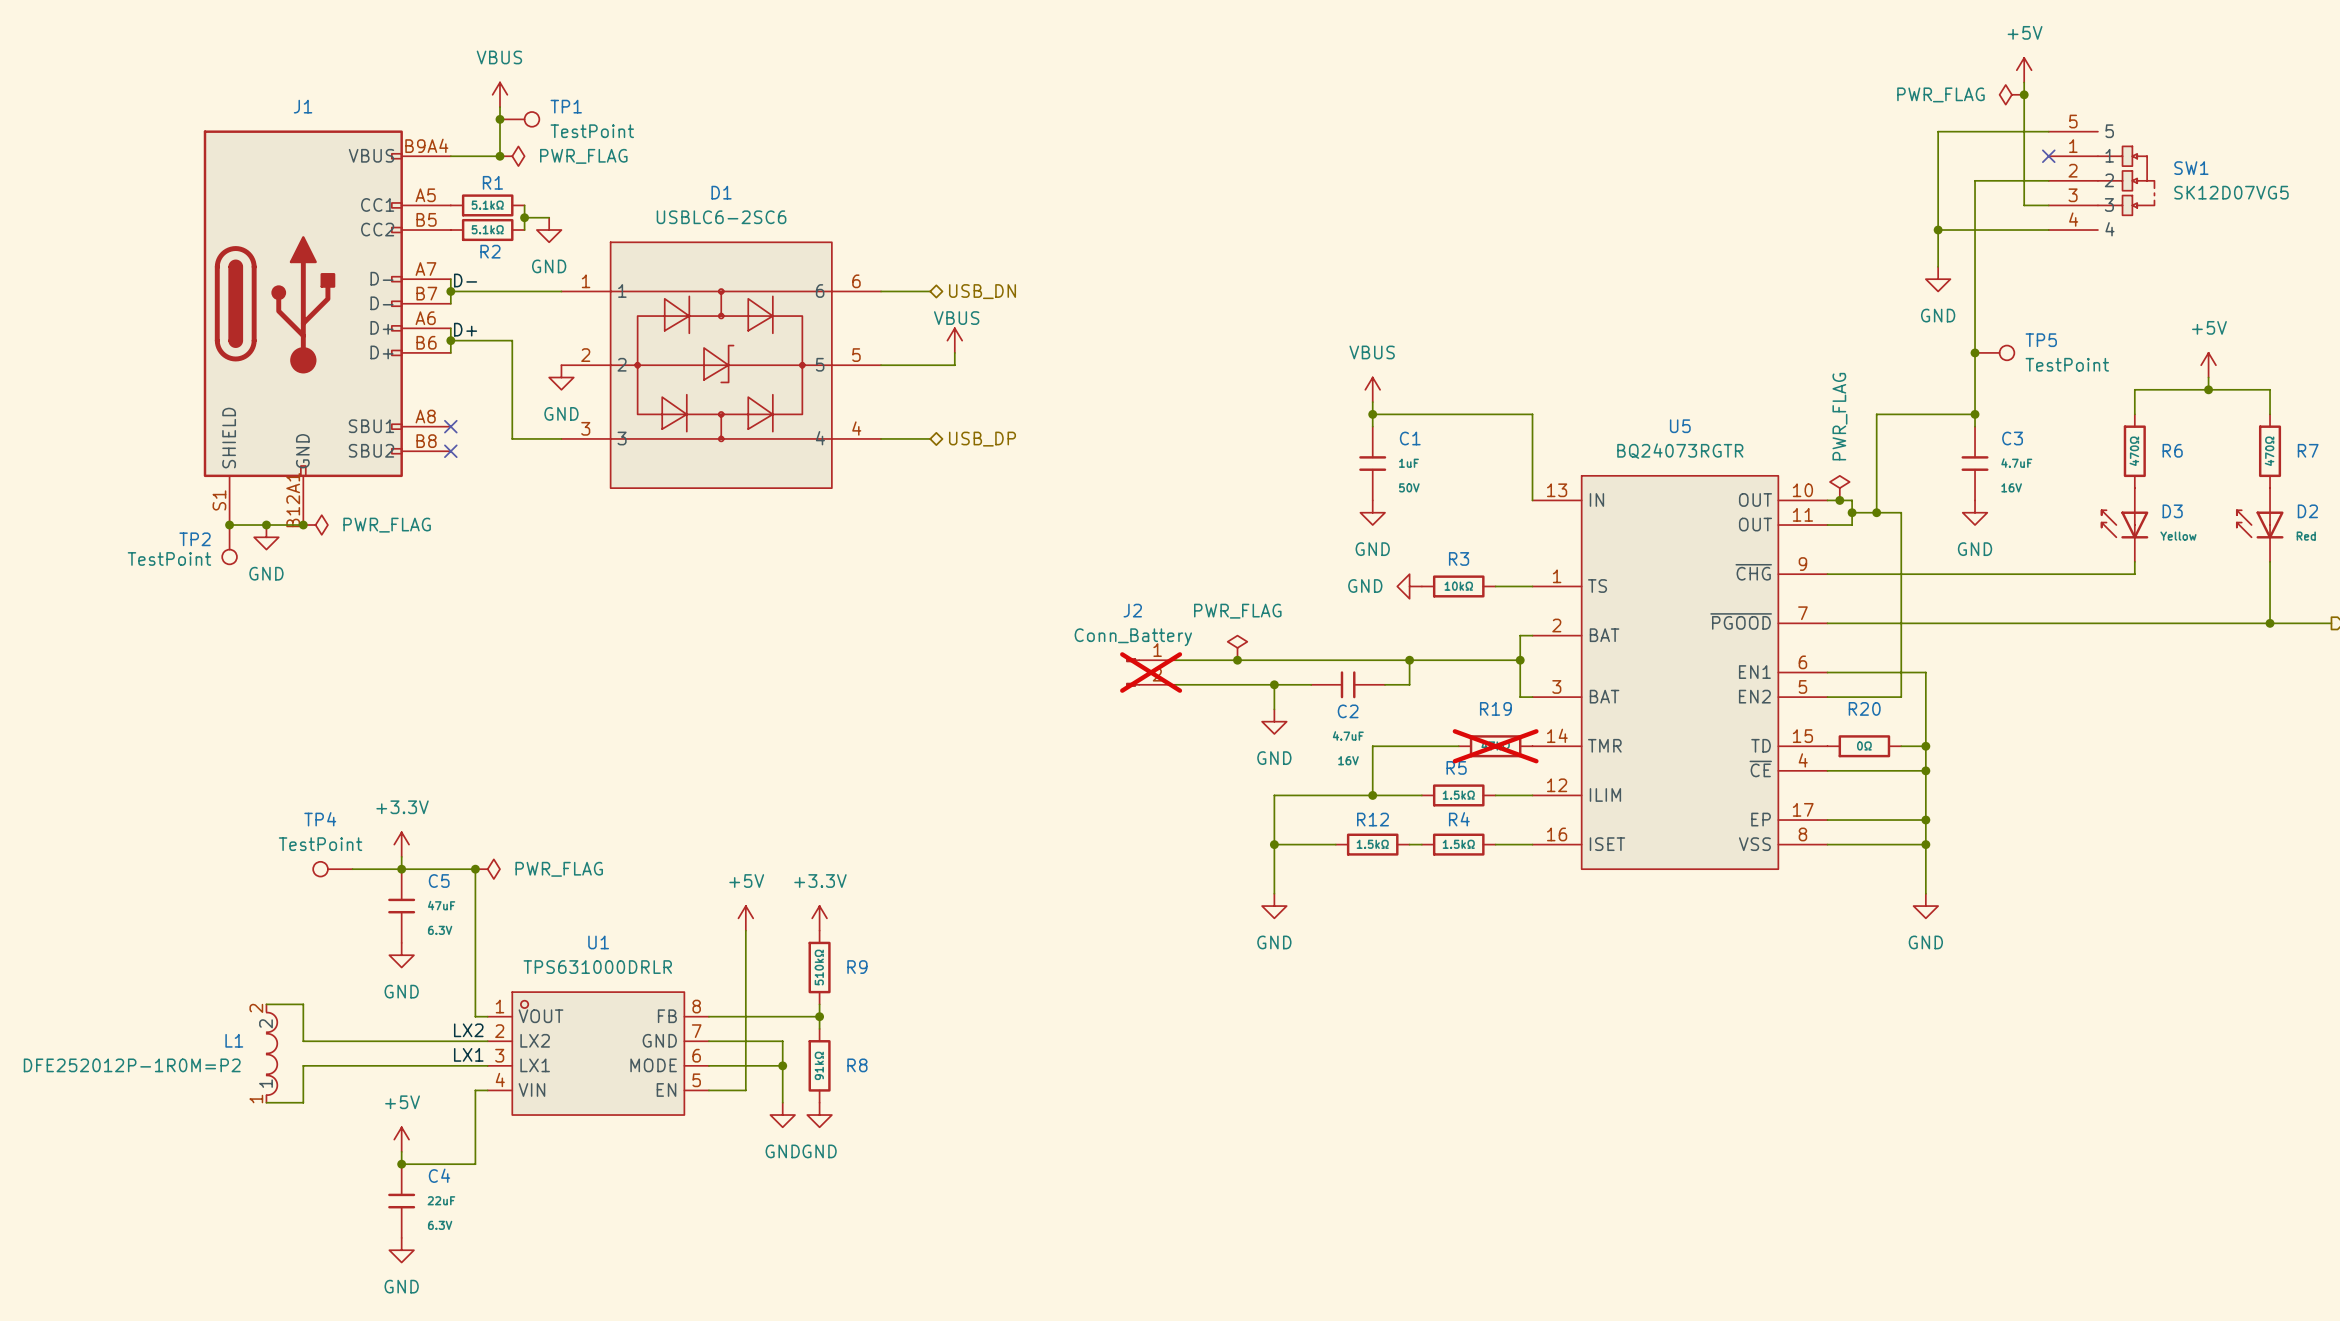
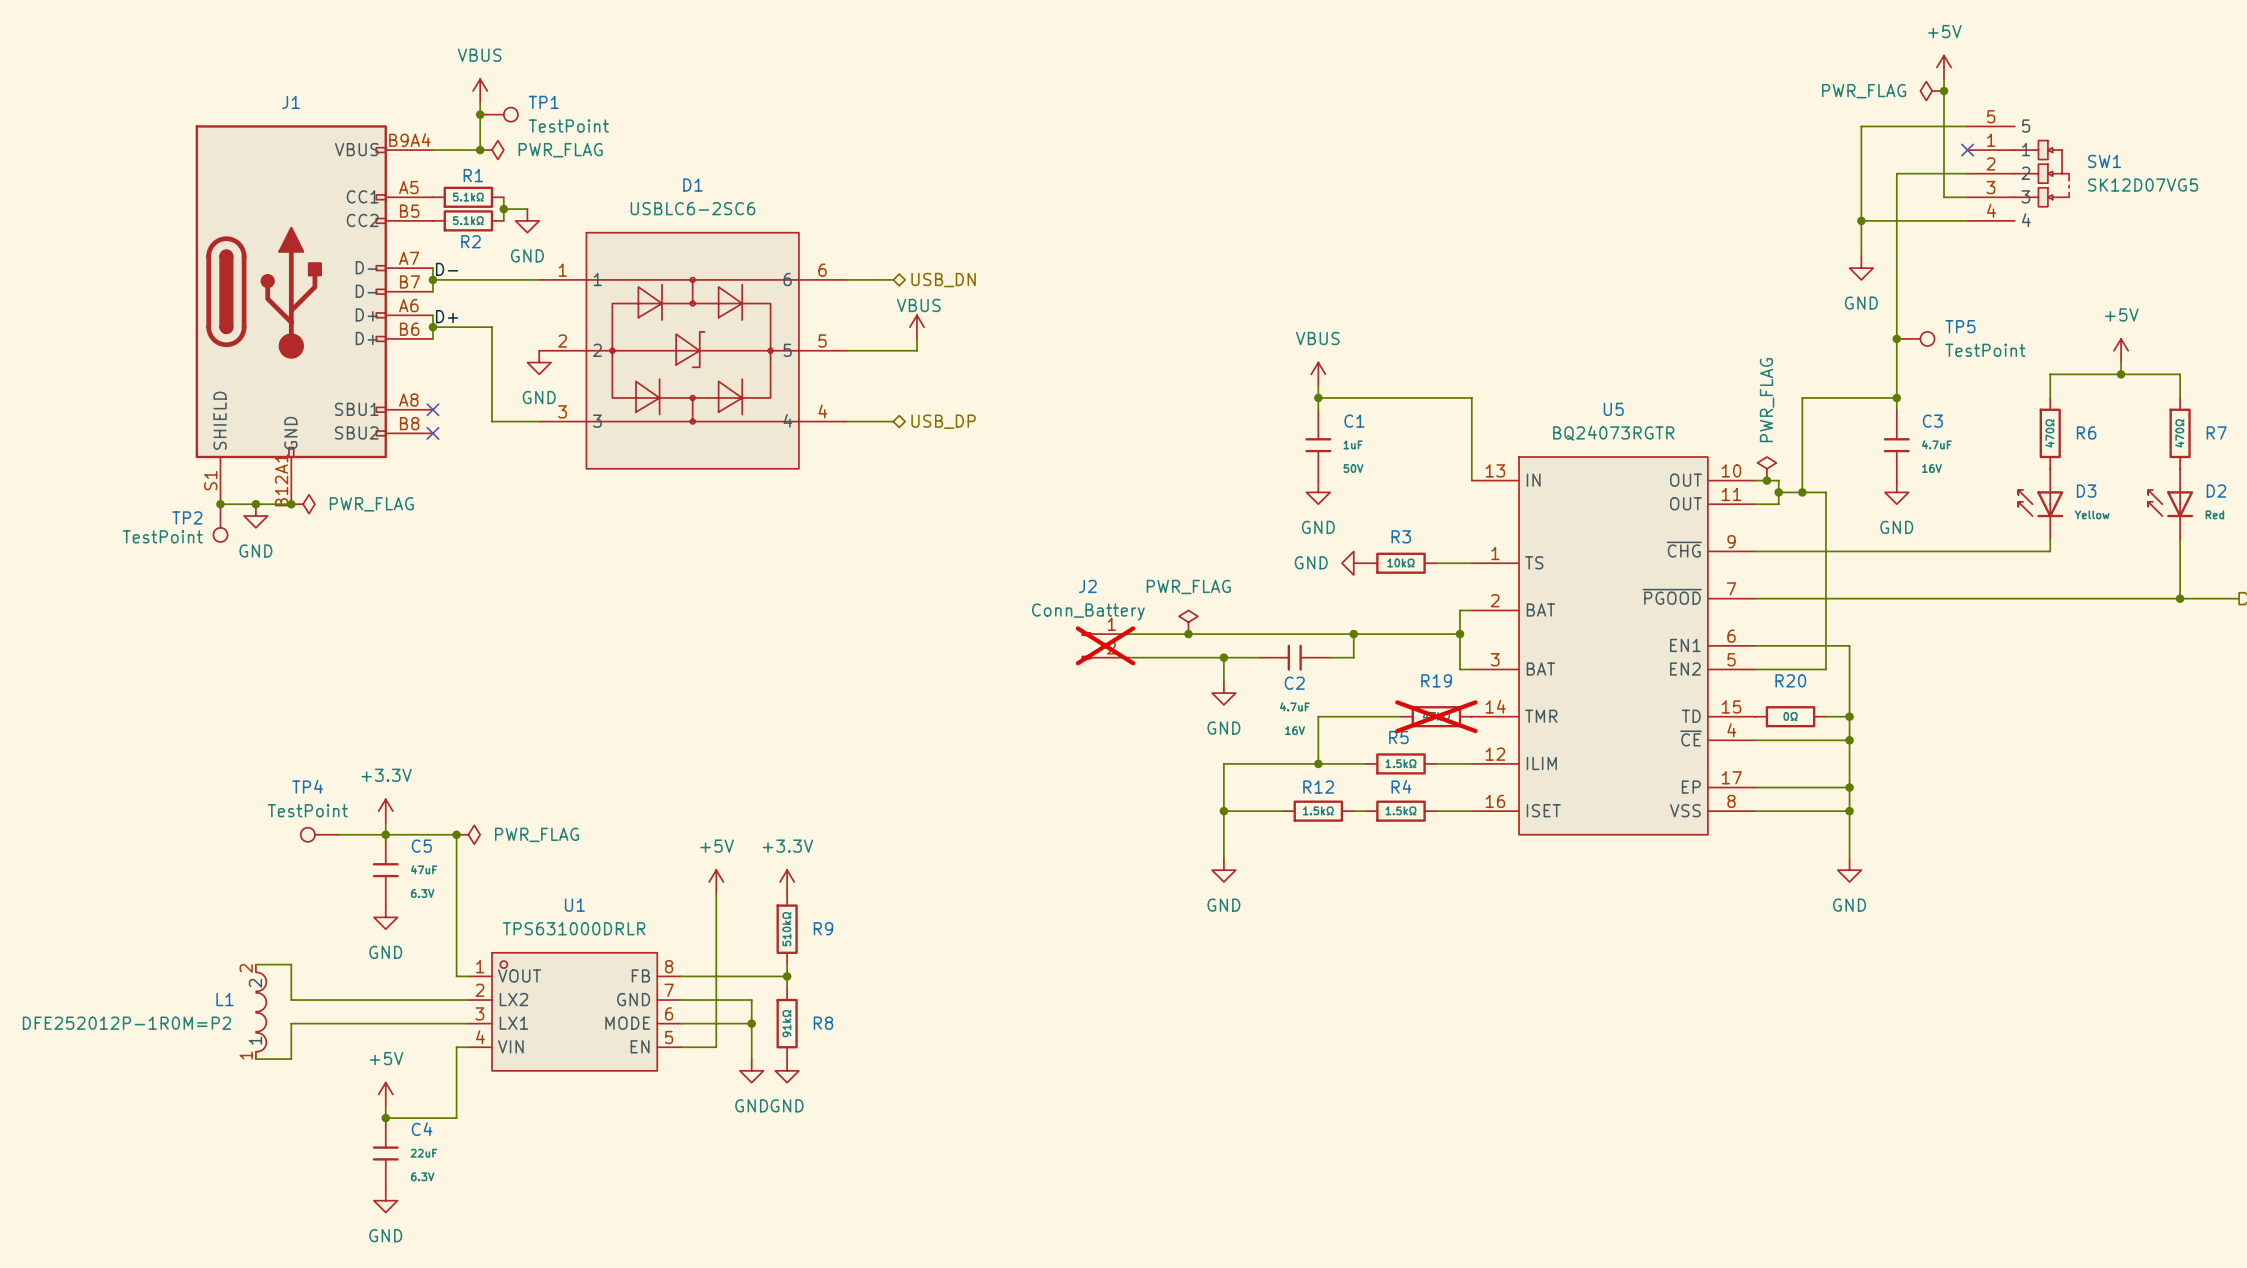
label: LX2 (468, 1030) -> none
label: LX1 (468, 1054) -> none

